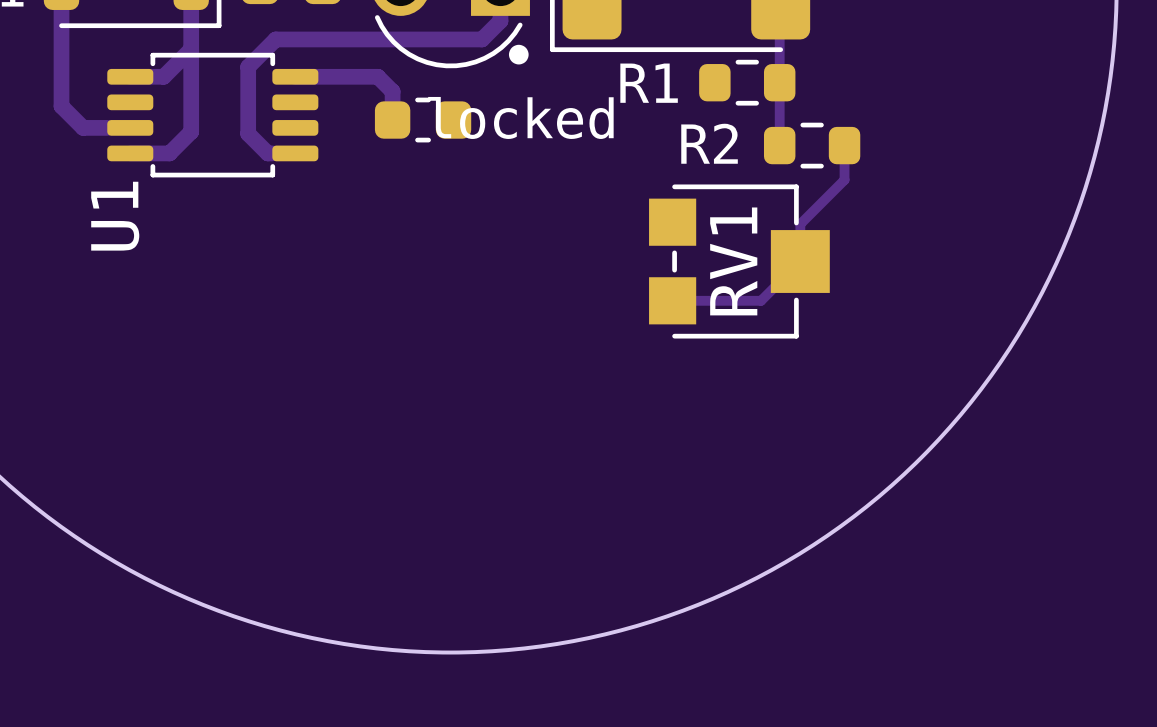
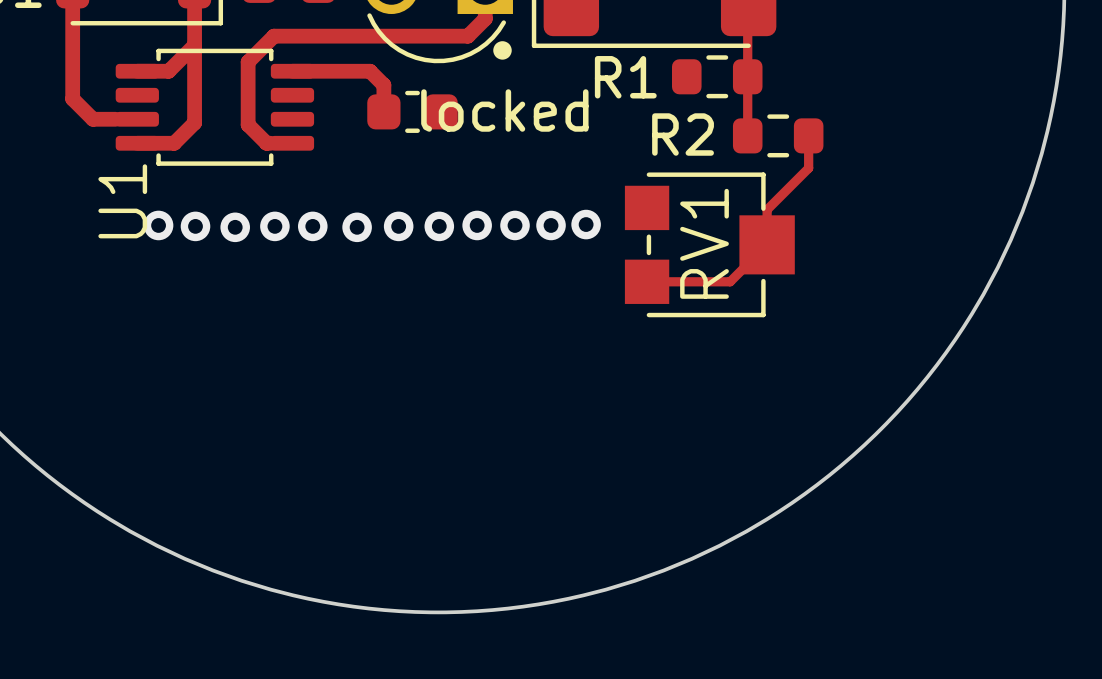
via: none -> (586, 224)
via: none -> (158, 225)
via: none -> (477, 225)
via: none -> (515, 225)
via: none -> (551, 225)
via: none -> (195, 226)
via: none -> (274, 226)
via: none -> (312, 226)
via: none -> (398, 226)
via: none -> (439, 226)
via: none -> (235, 227)
via: none -> (357, 227)

